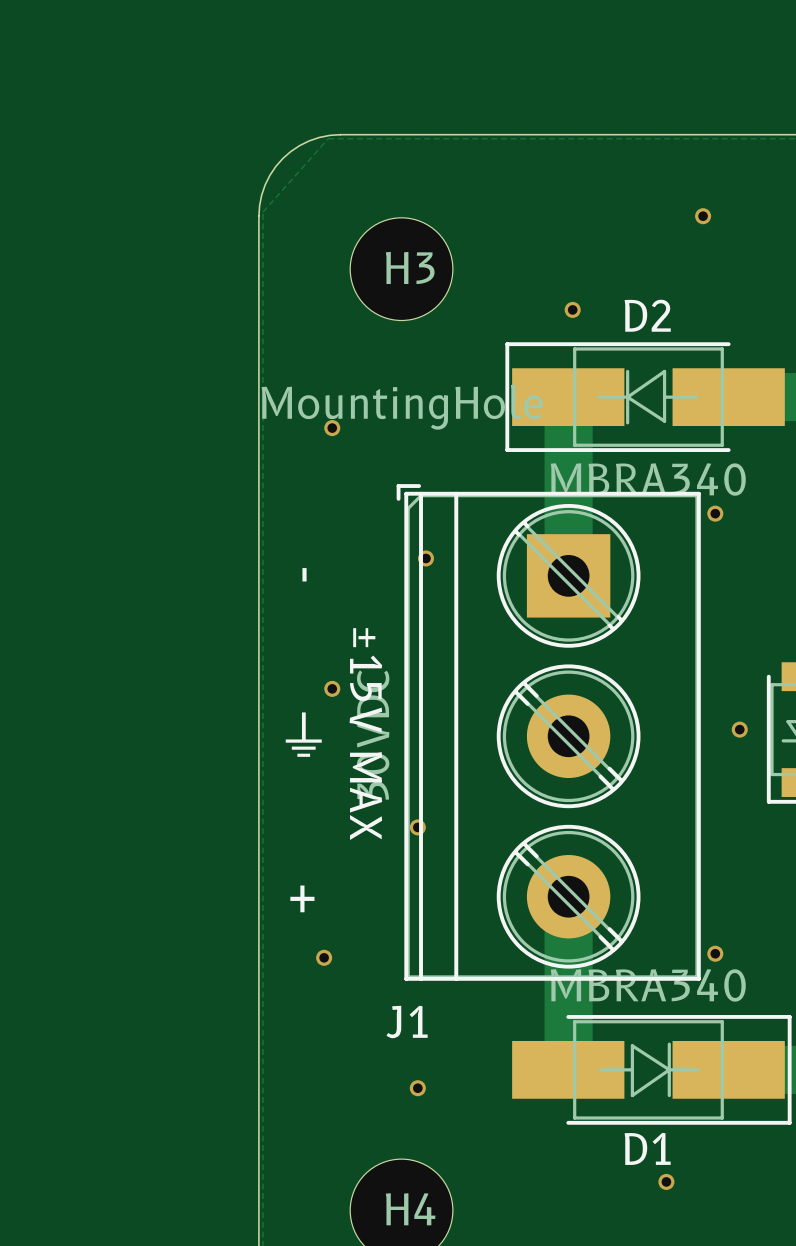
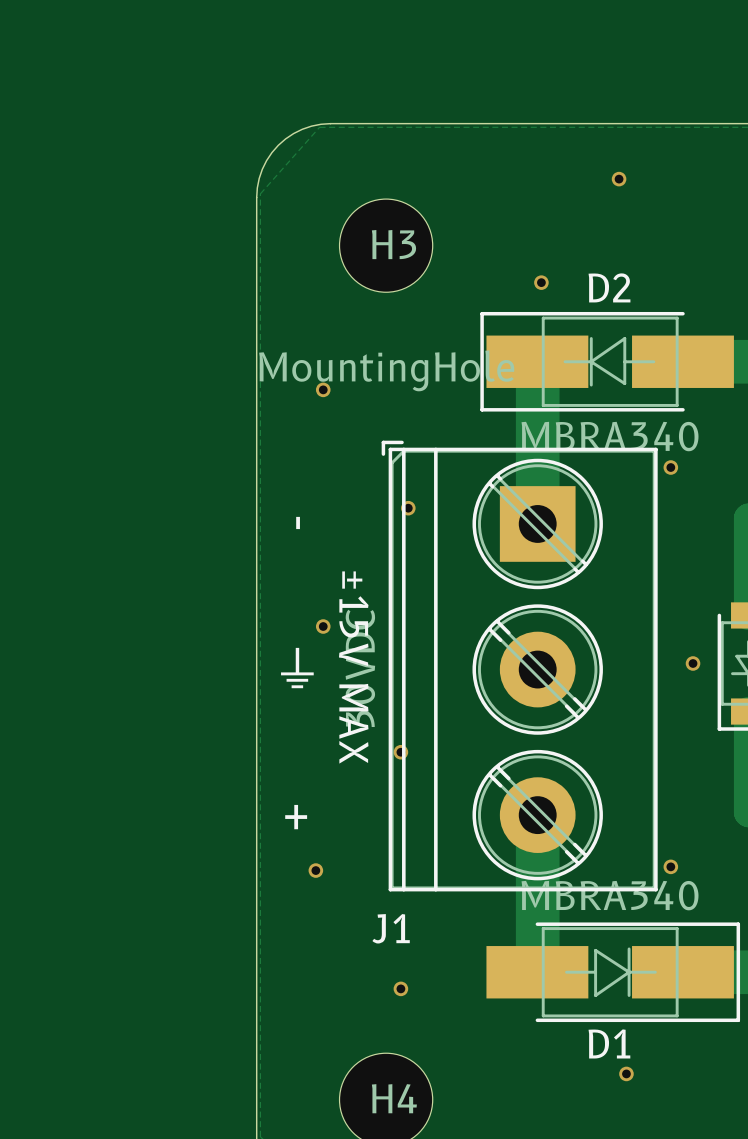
via position: (703, 216) -> (619, 179)

